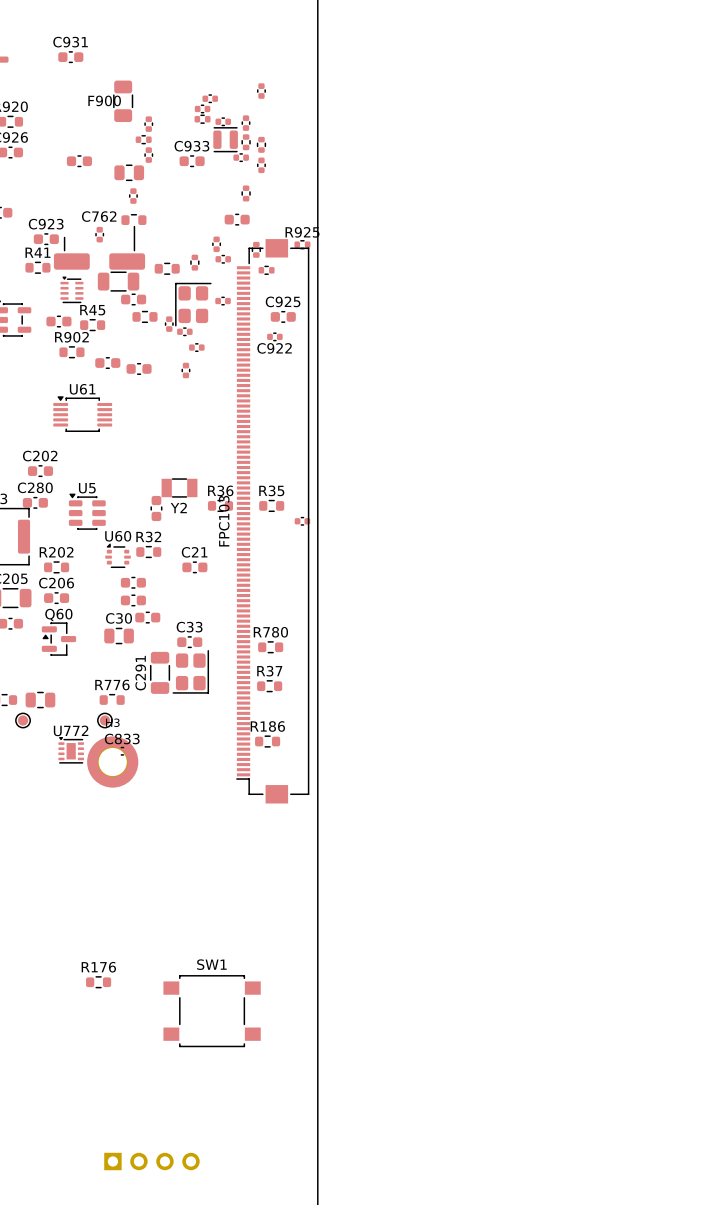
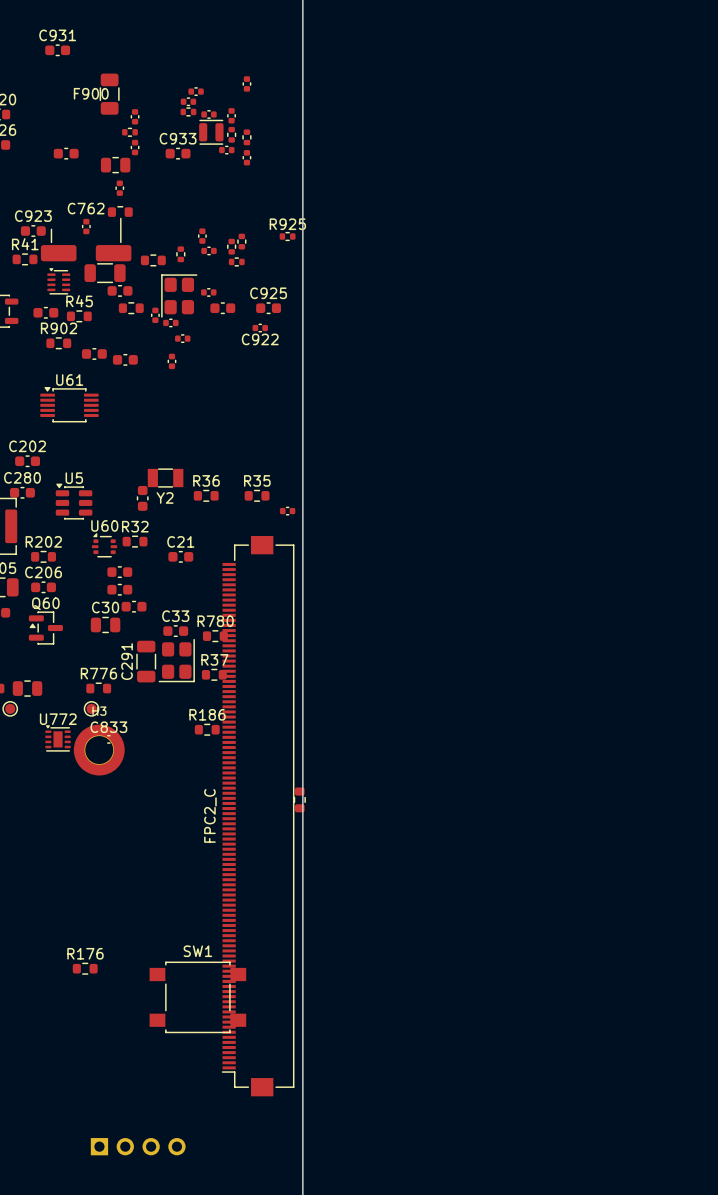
part: (246, 193) -> none
part position: (237, 219) -> (222, 308)
part: none -> (231, 246)
part: none -> (236, 261)
part: (266, 270) -> none
FPC103: (272, 521) -> none
R780 position: (270, 647) -> (215, 636)
R37 position: (269, 686) -> (214, 674)
R186 position: (267, 741) -> (207, 729)
part: none -> (299, 799)
FPC2_C: none -> (258, 816)

